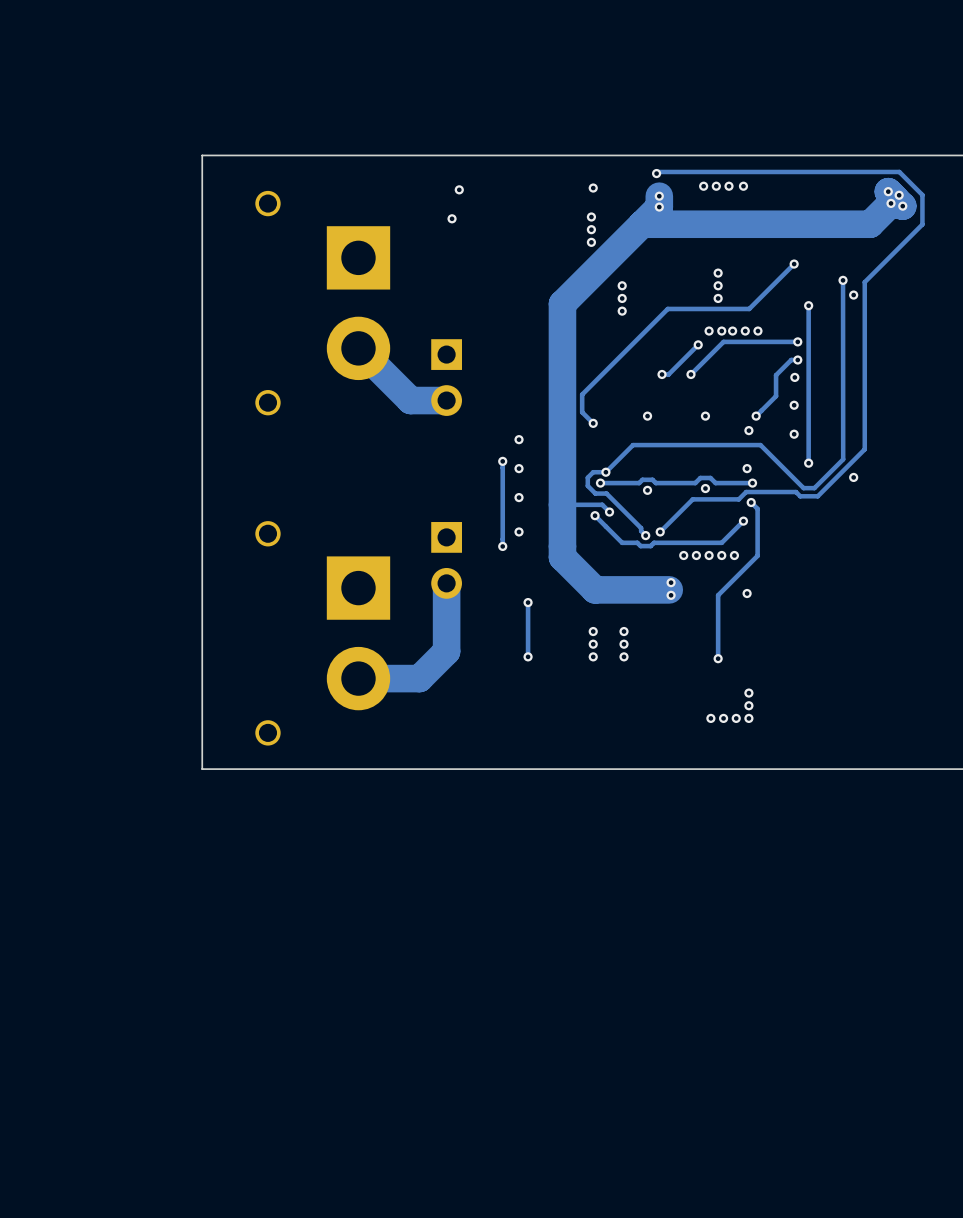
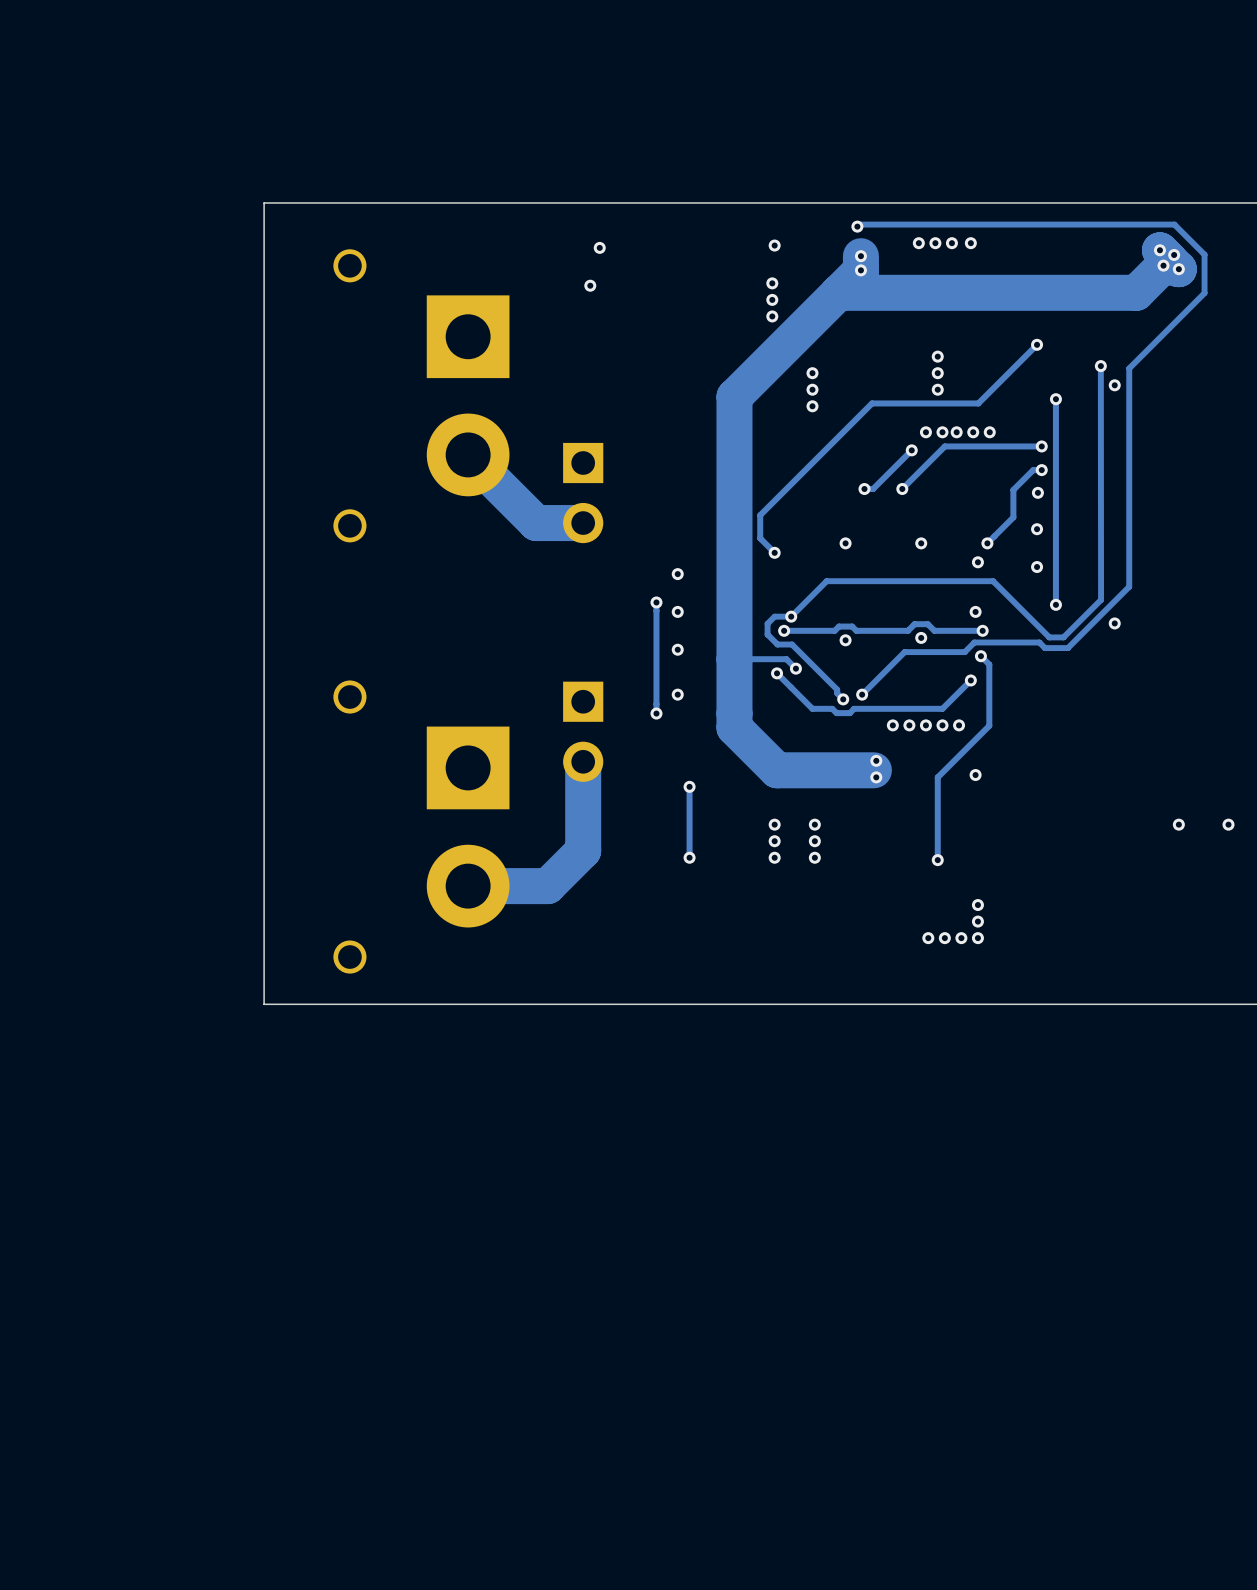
via: none -> (1178, 824)
via: none -> (1228, 824)

